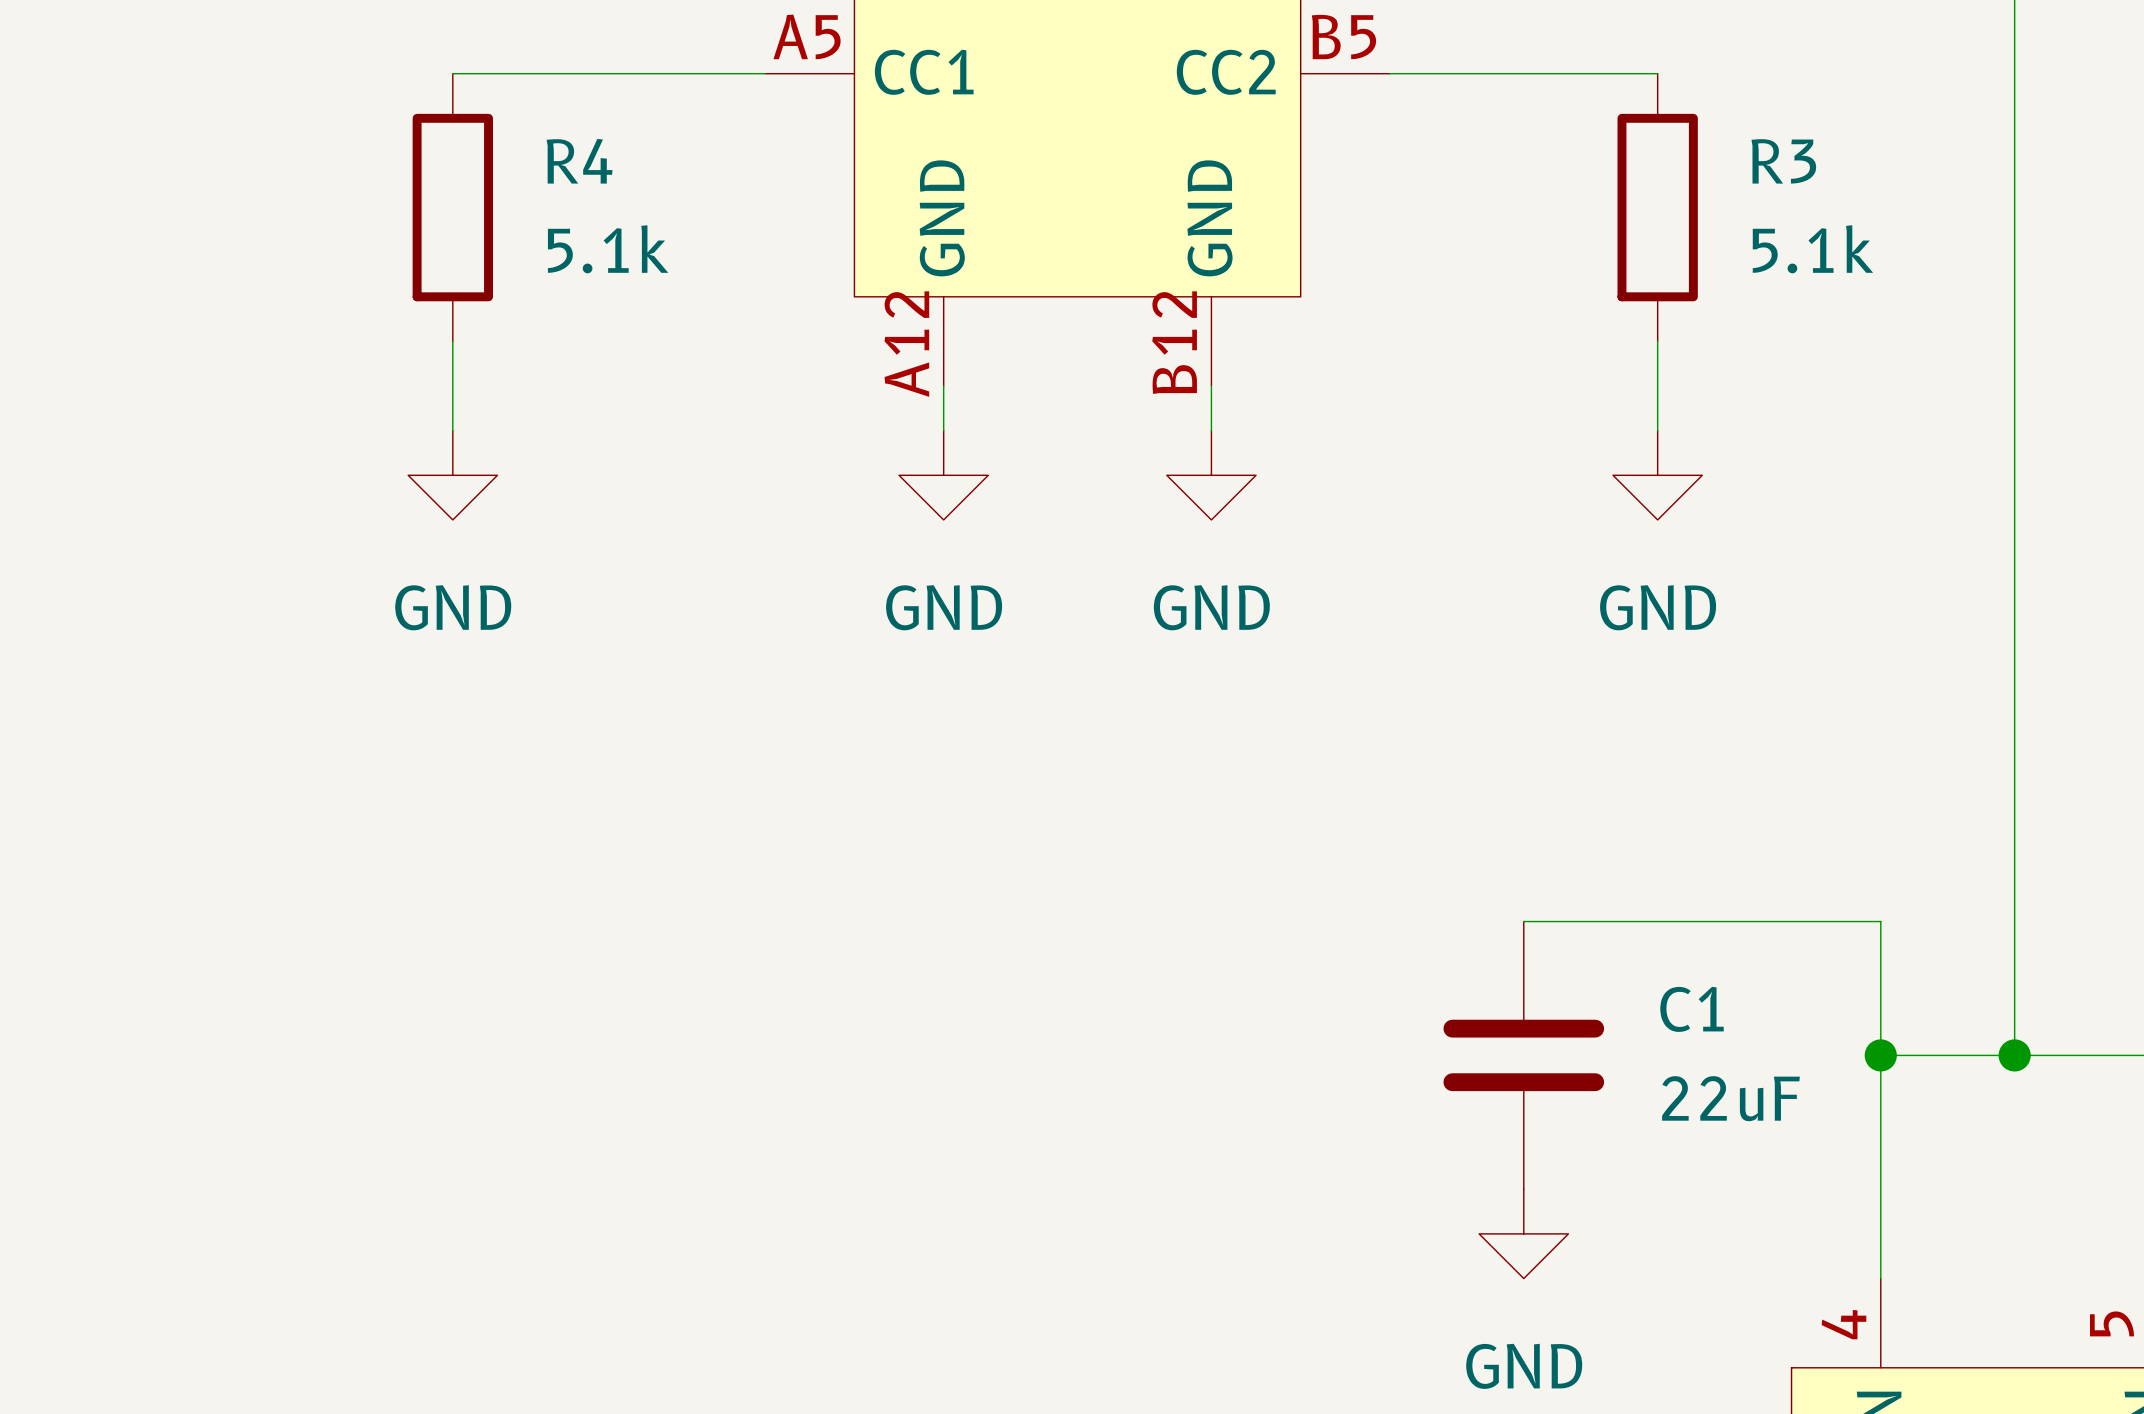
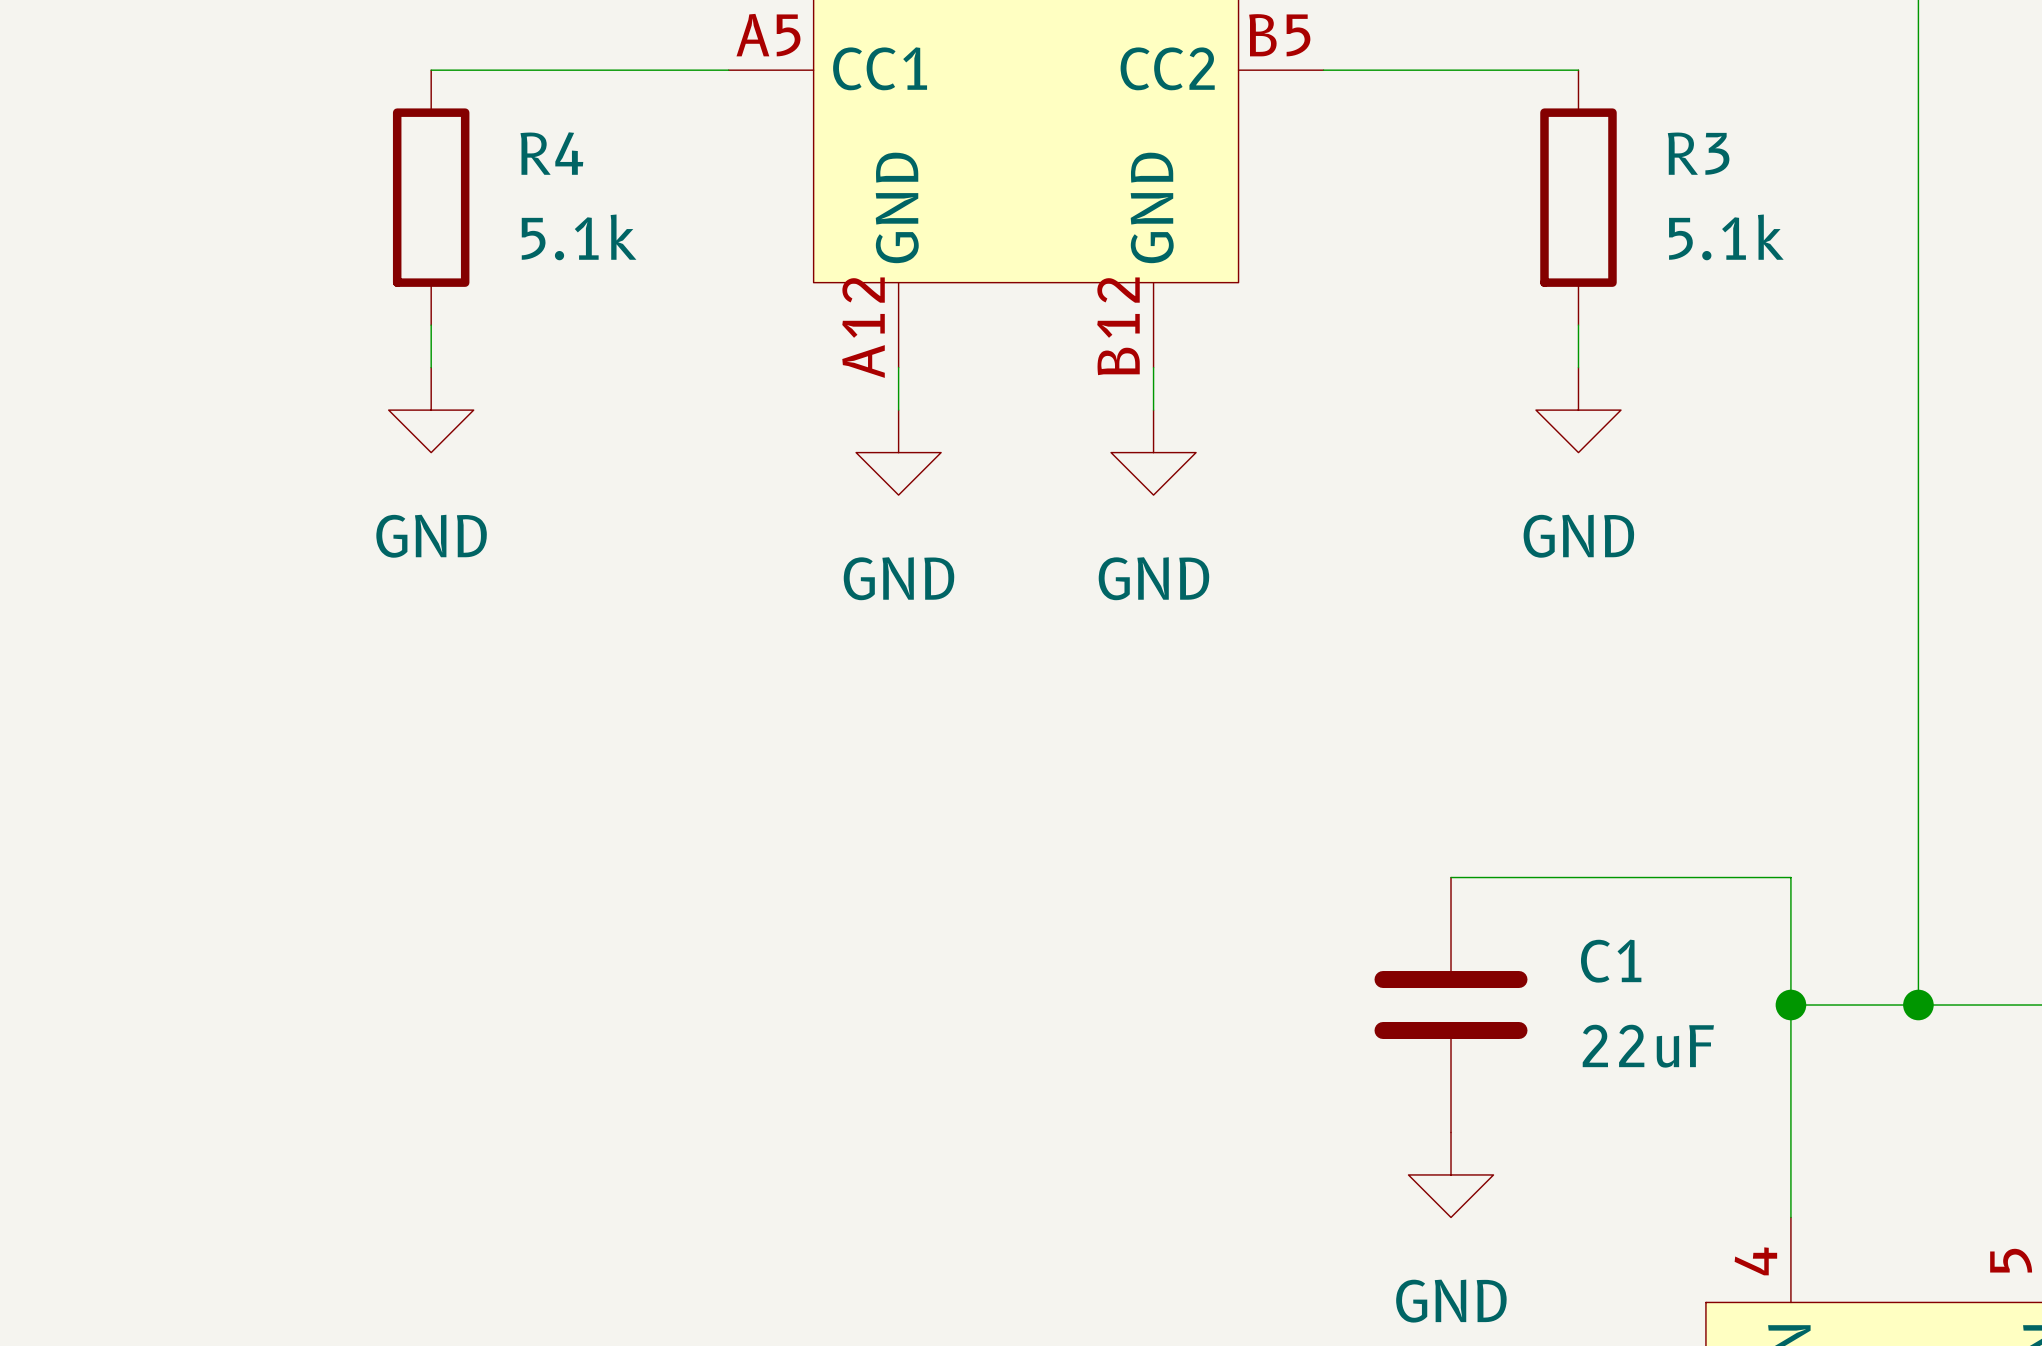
power symbol position: GND (452, 475) -> GND (431, 410)
power symbol position: GND (1657, 475) -> GND (1578, 410)

